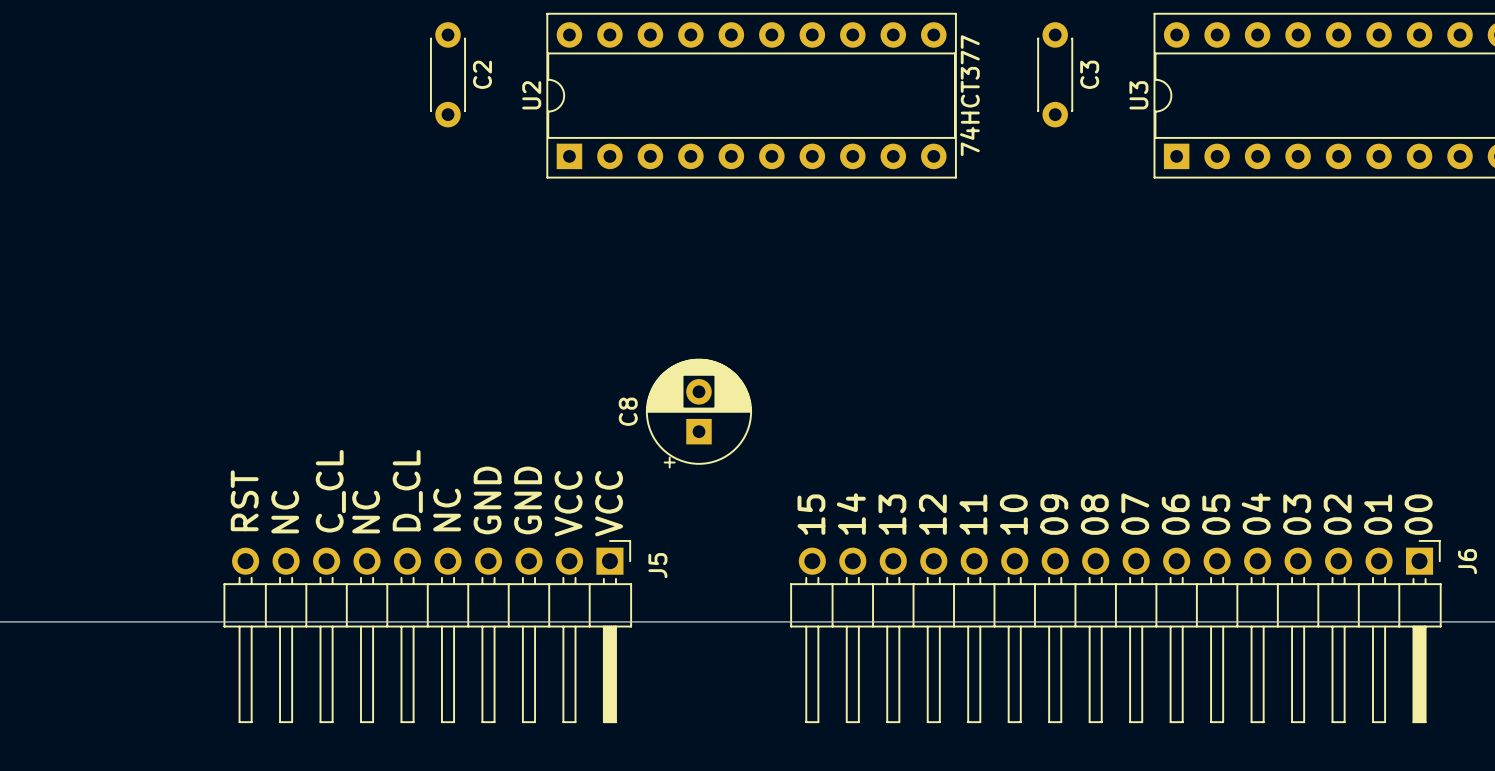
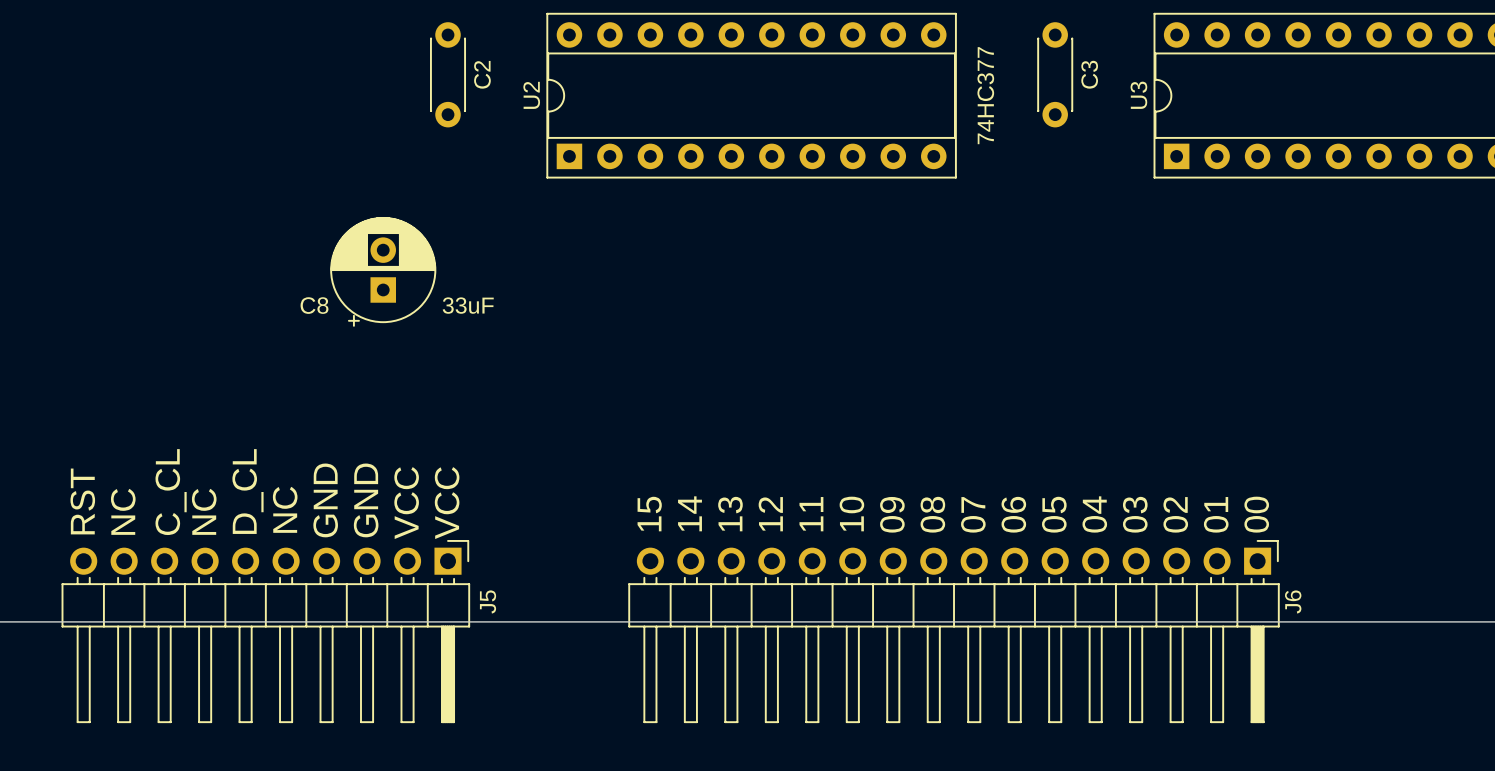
U2 value: 74HCT377 (969, 95) -> 74HC377 (985, 95)
C8 value: none -> 33uF (468, 305)
C8 name rotation: 0° (628, 411) -> 90° clockwise (314, 305)
C8 position: (698, 413) -> (383, 271)
J6 name position: J6 (1467, 561) -> J6 (1293, 602)
J5 name position: J5 (657, 565) -> J5 (488, 601)
J5 position: (427, 631) -> (265, 631)
J6 position: (1115, 631) -> (954, 631)

